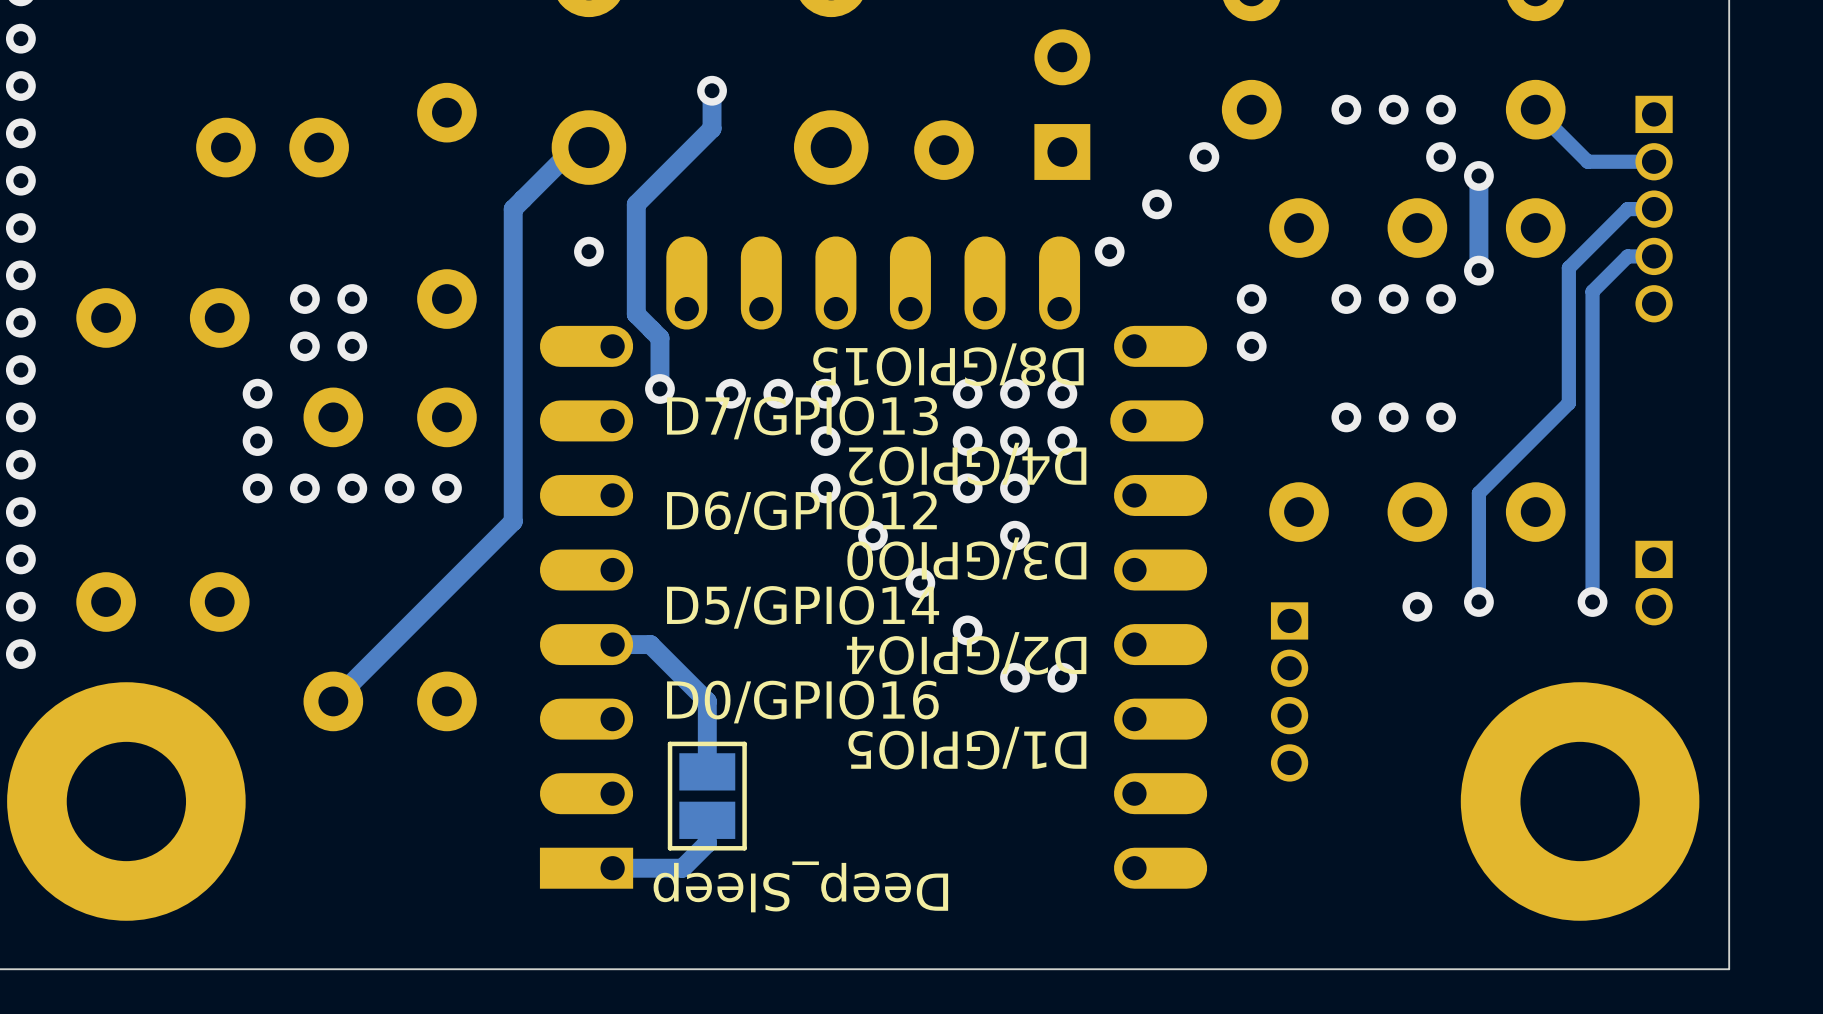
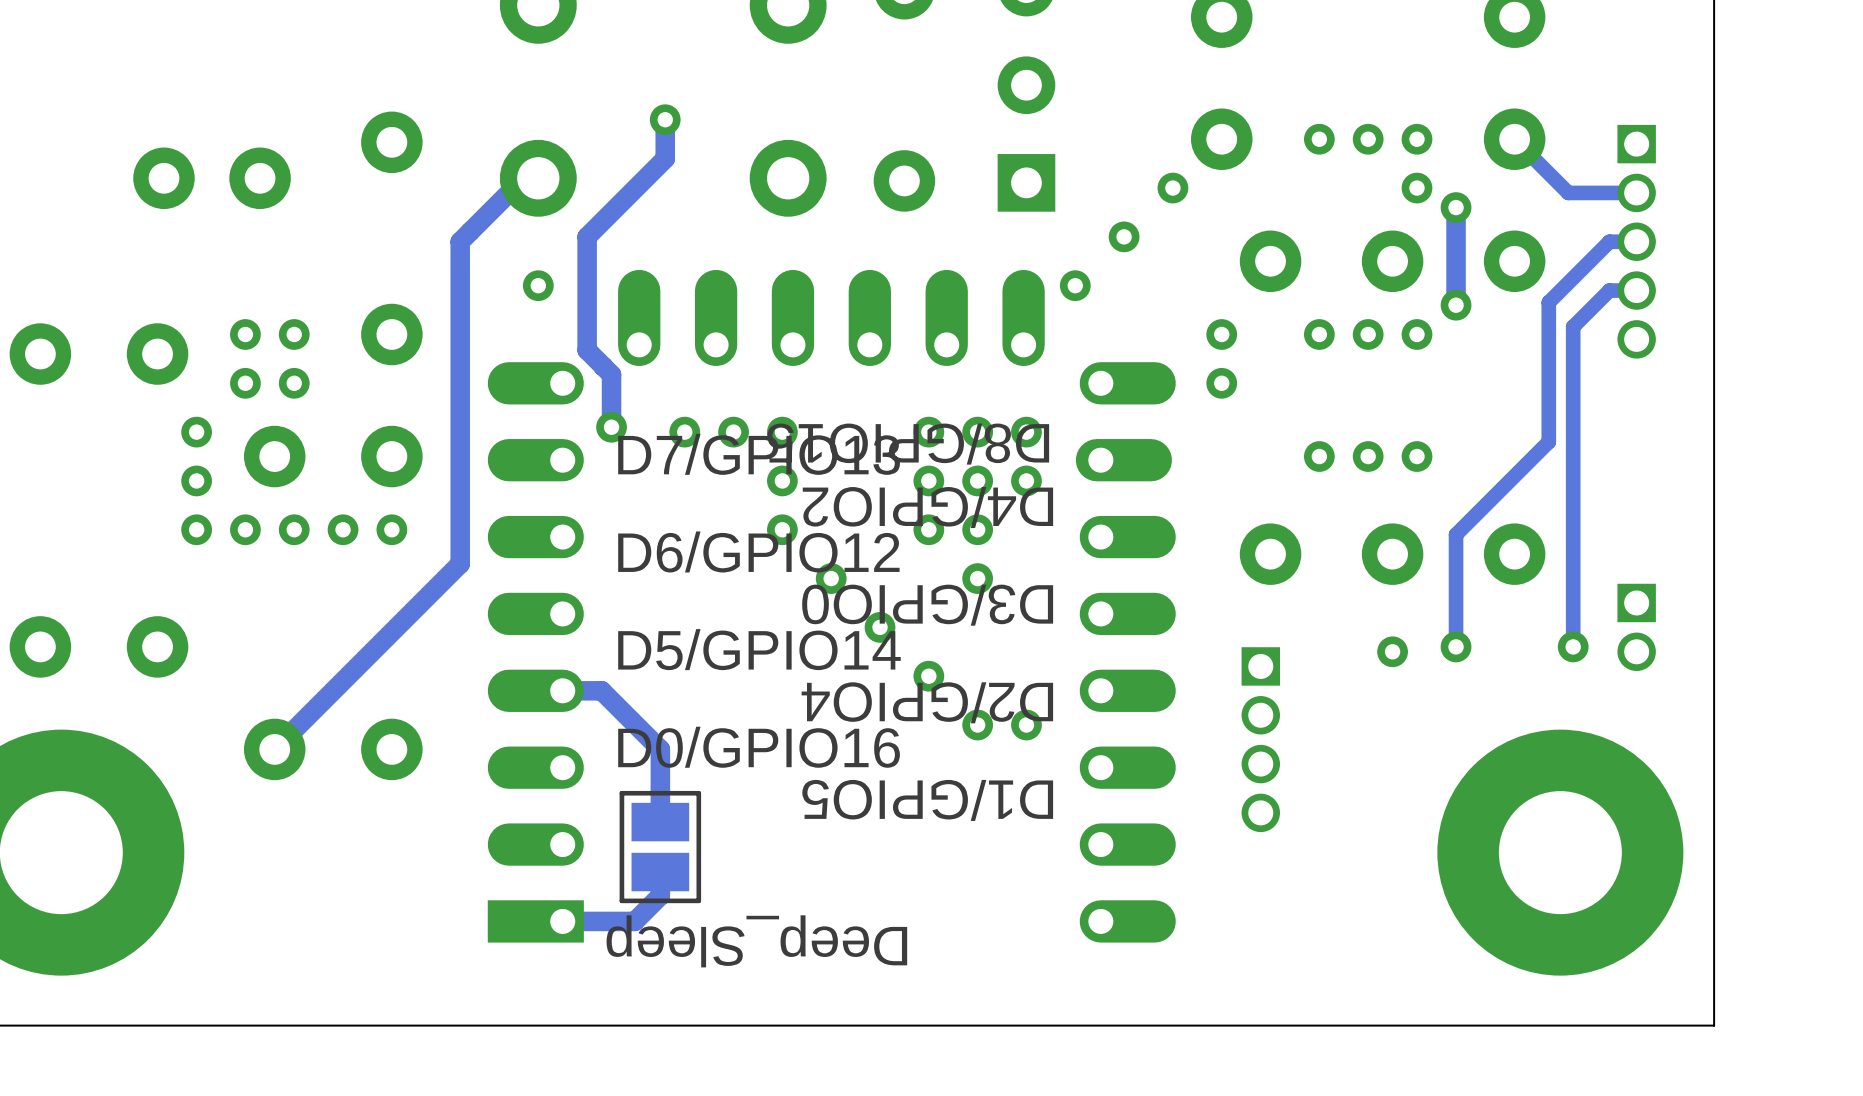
part position: (948, 364) -> (908, 444)

